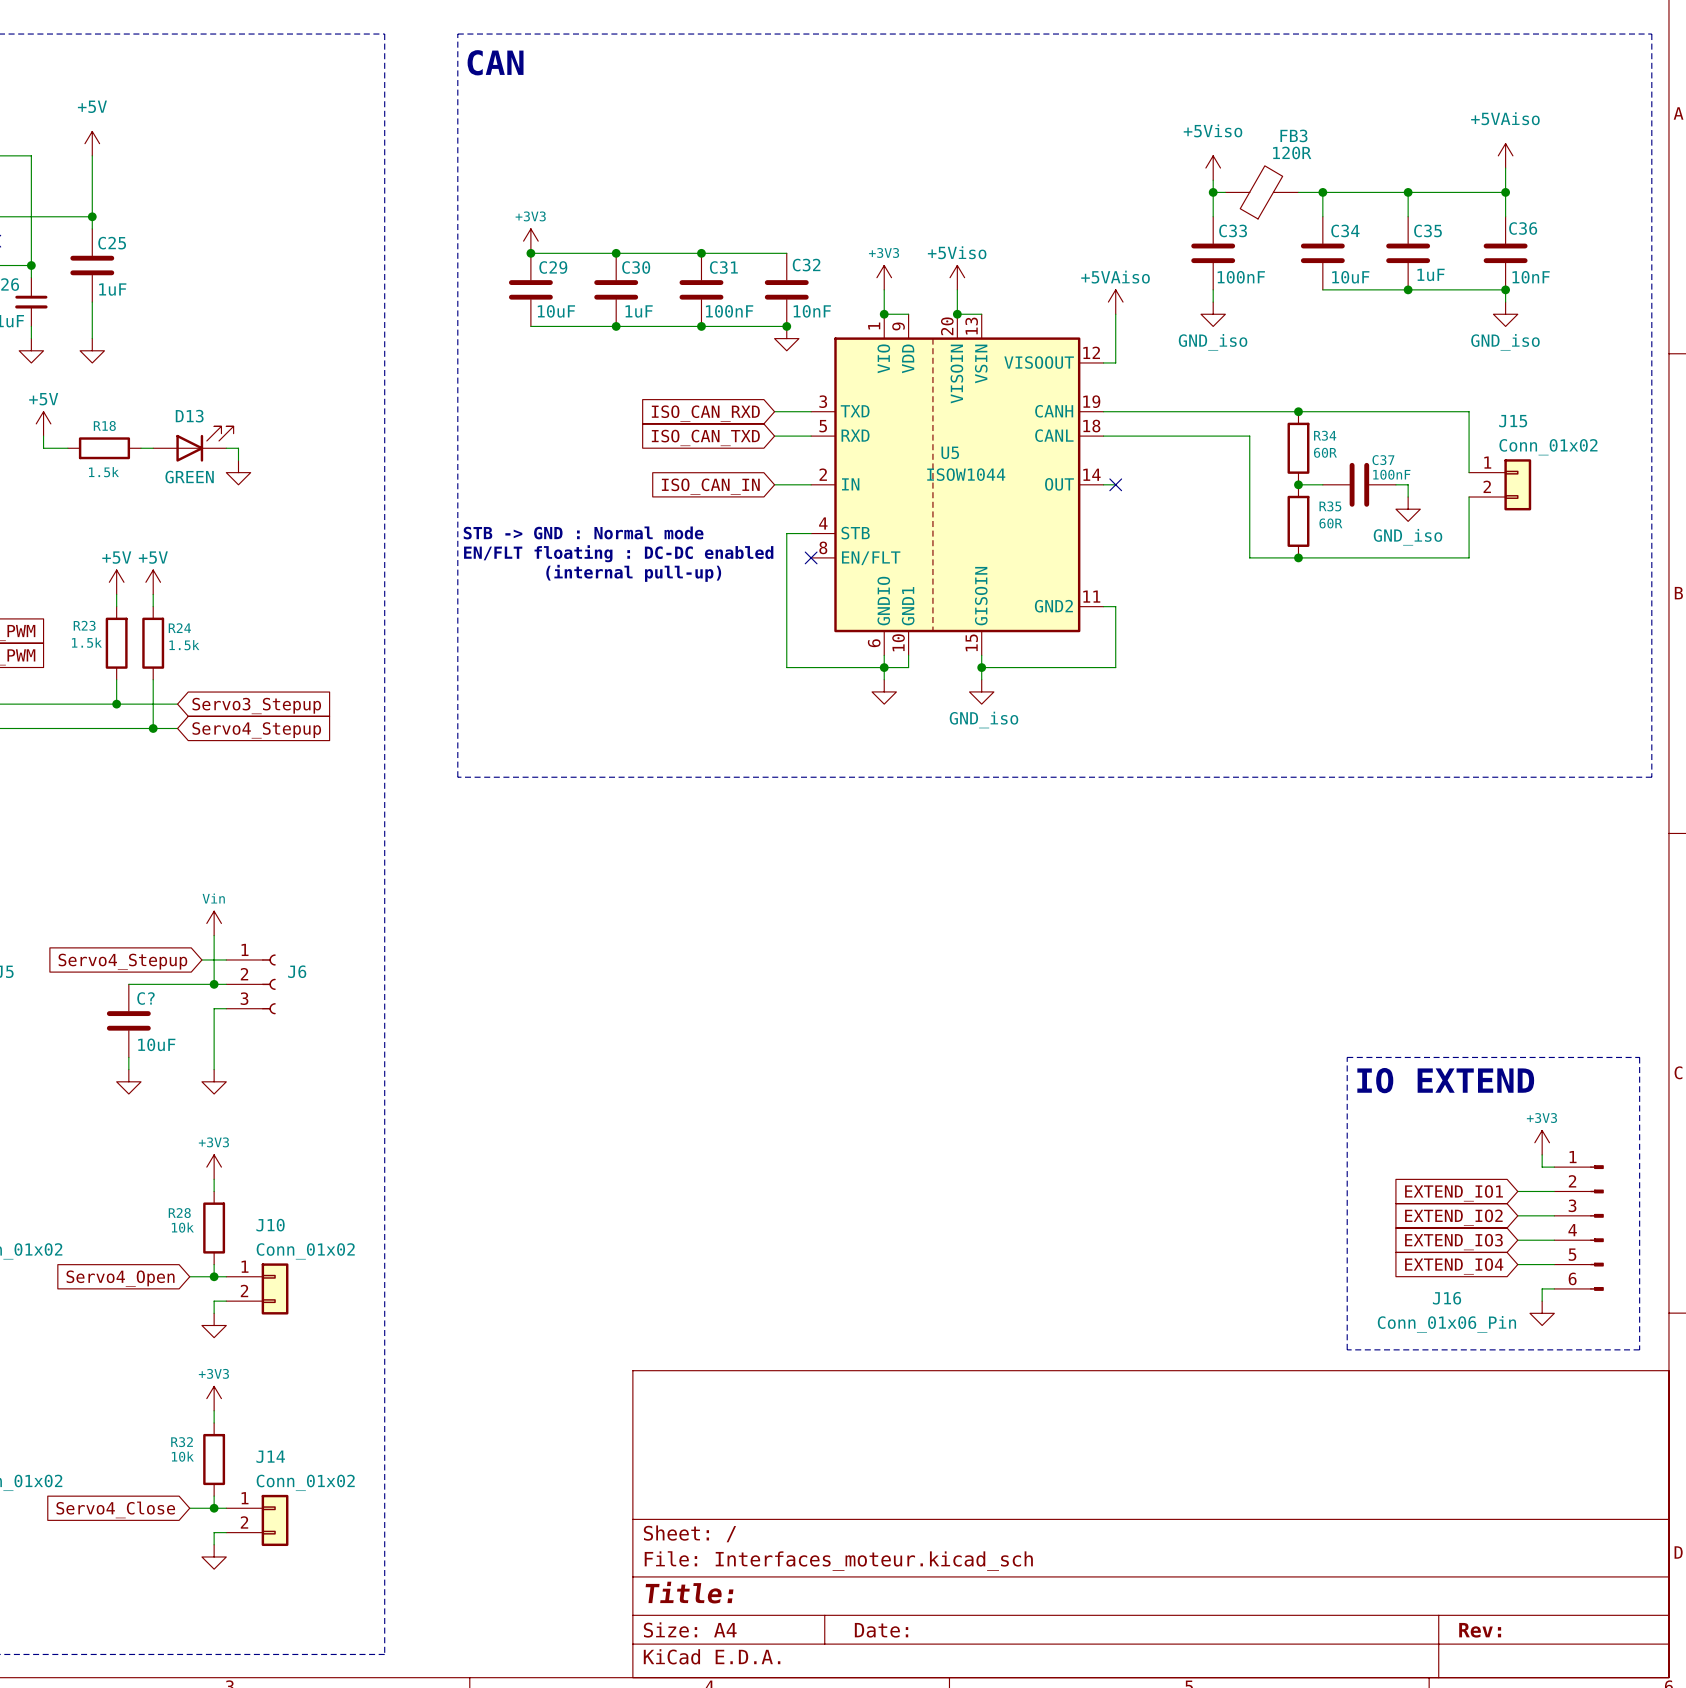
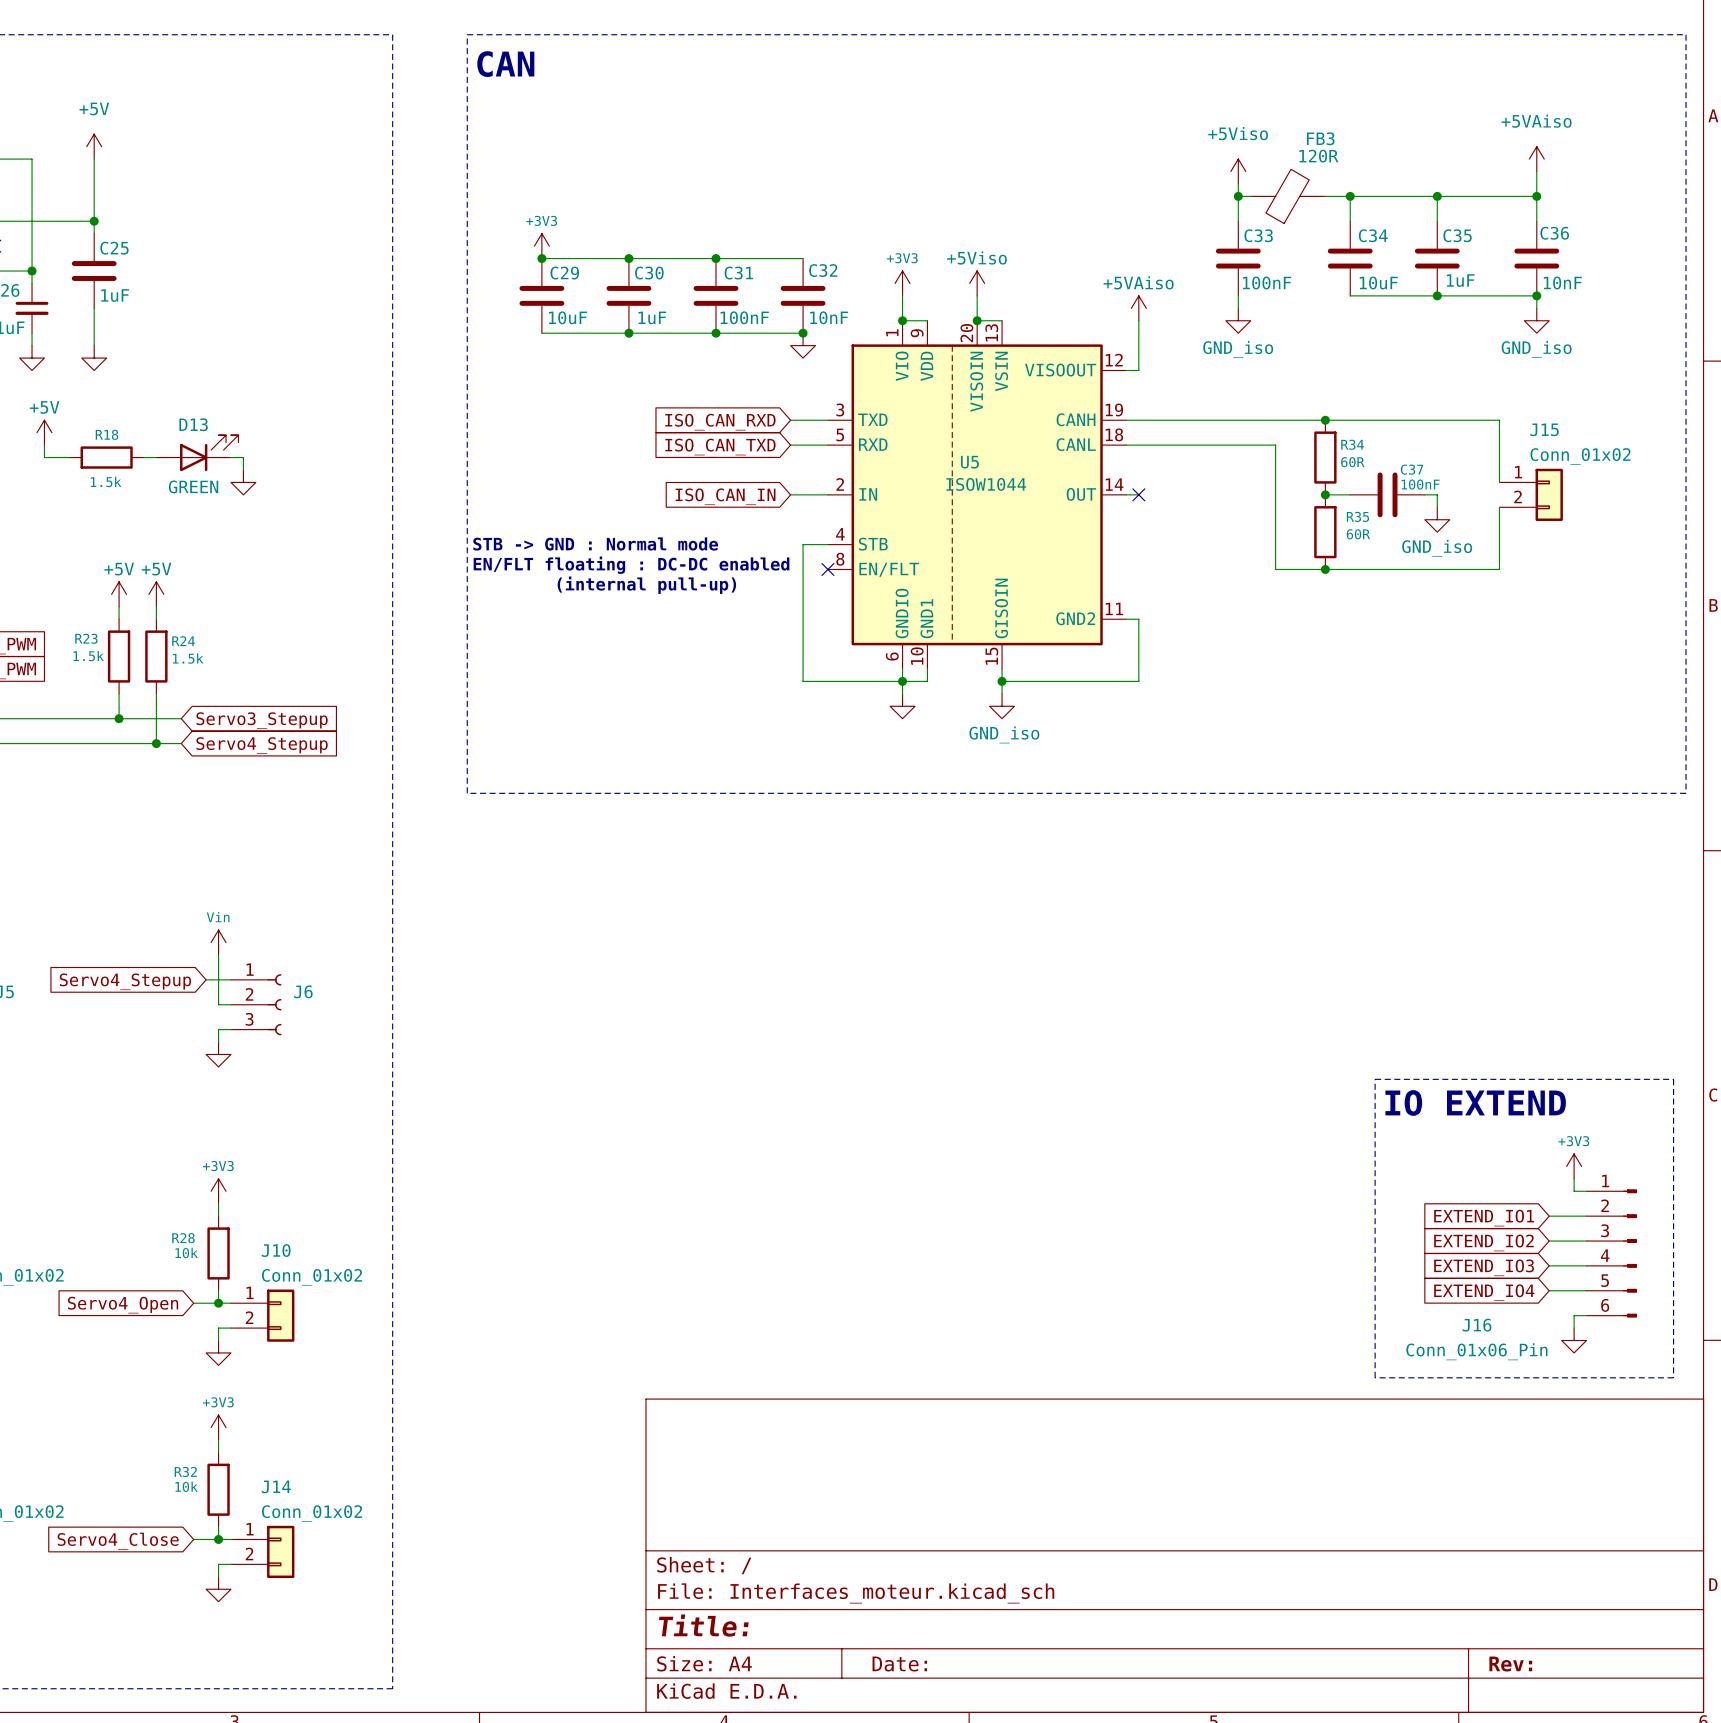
wire: (128, 984) (214, 984) -> none
junction: (214, 984) -> none
C?: 10uF (128, 1020) -> none
wire: (214, 1020) (214, 1069) -> none
wire: (128, 1057) (128, 1069) -> none
power symbol: (128, 1081) -> none
power symbol position: (214, 1081) -> (218, 1054)

